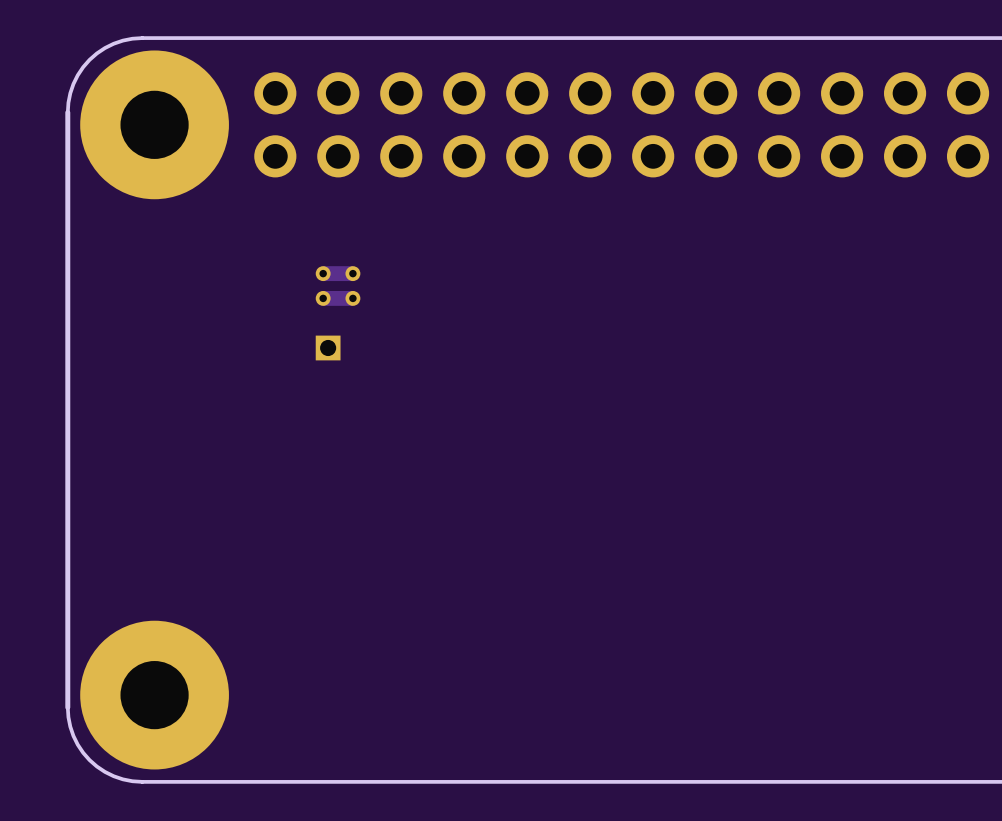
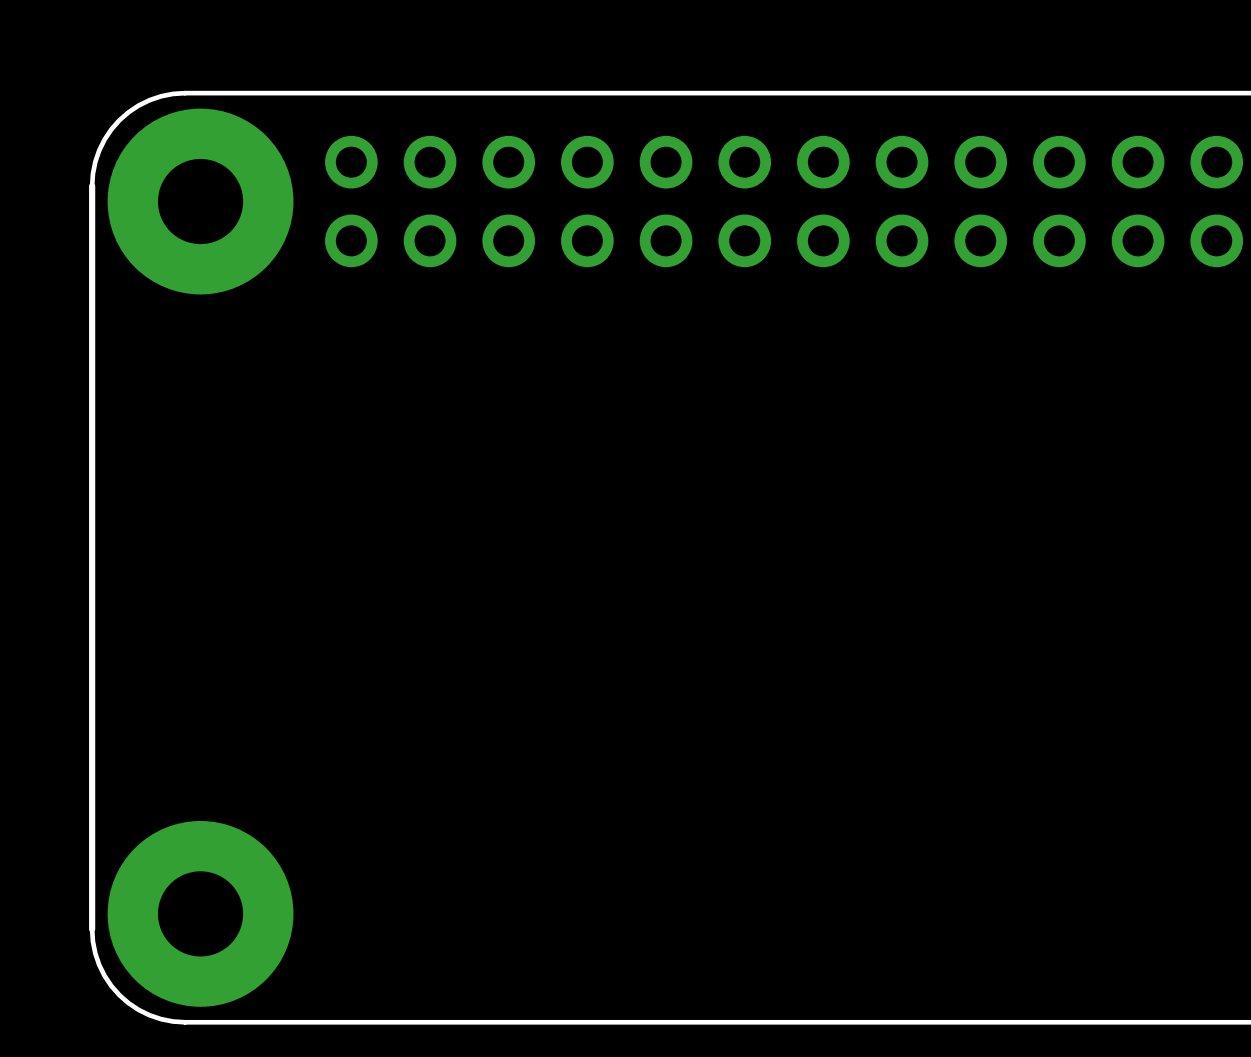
part: (338, 273) -> none
part: (338, 298) -> none
part: (328, 347) -> none

